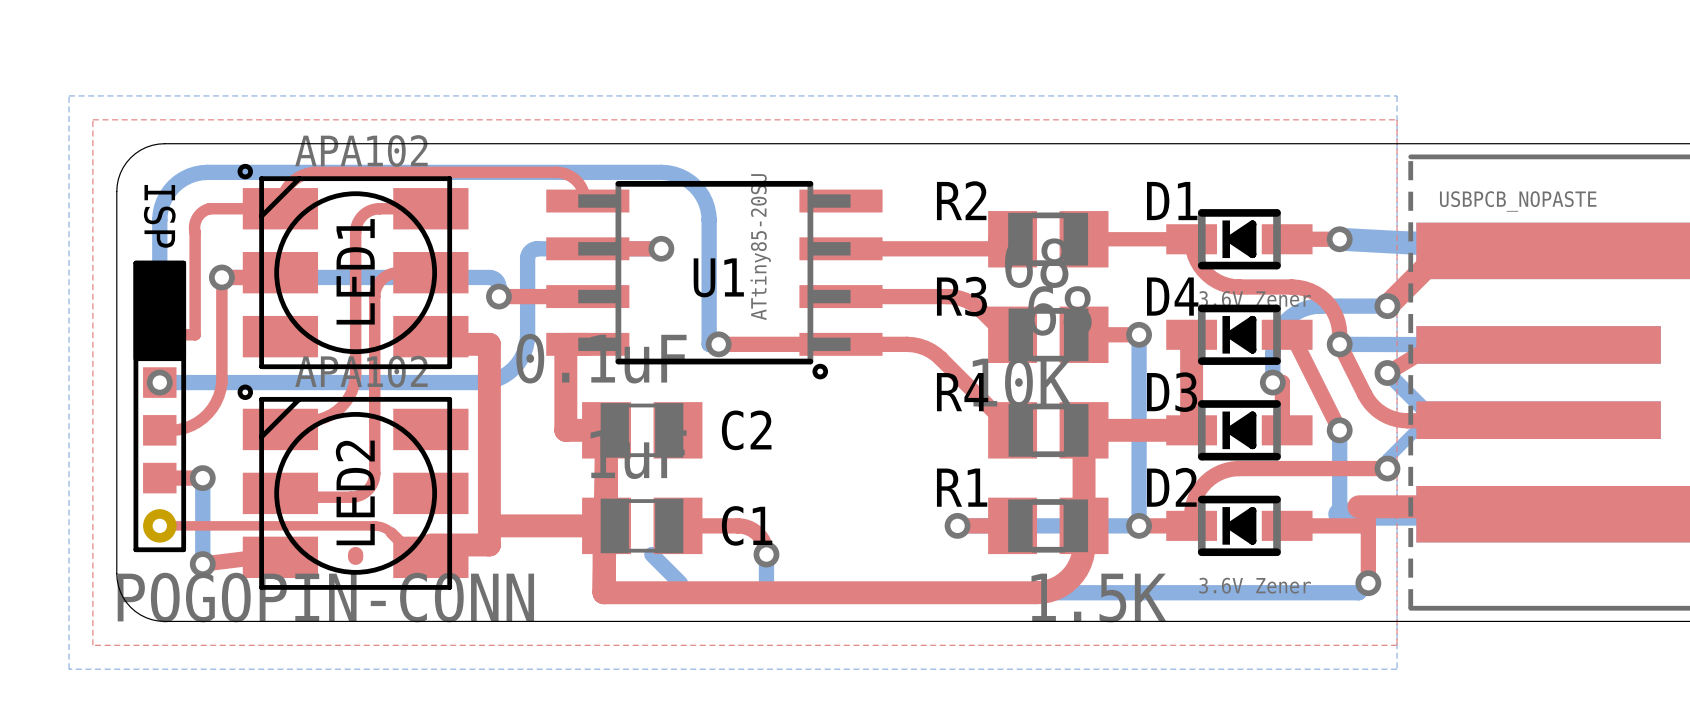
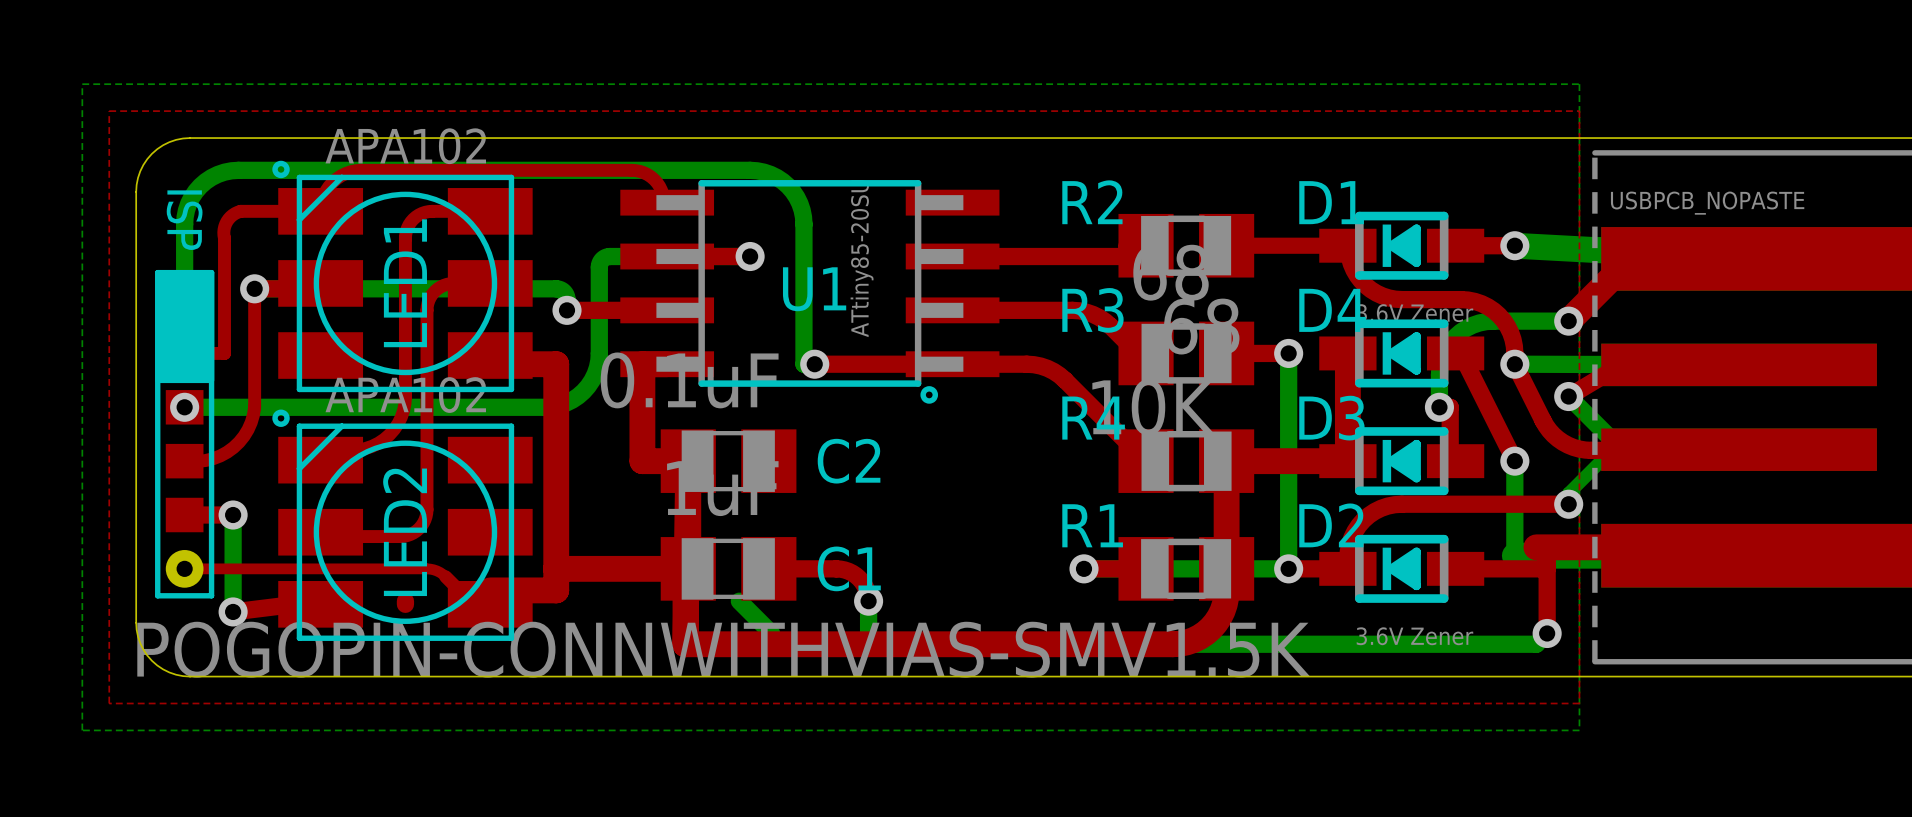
ISP value: POGOPIN-CONN (325, 597) -> POGOPIN-CONNWITHVIAS-SMV (646, 649)

